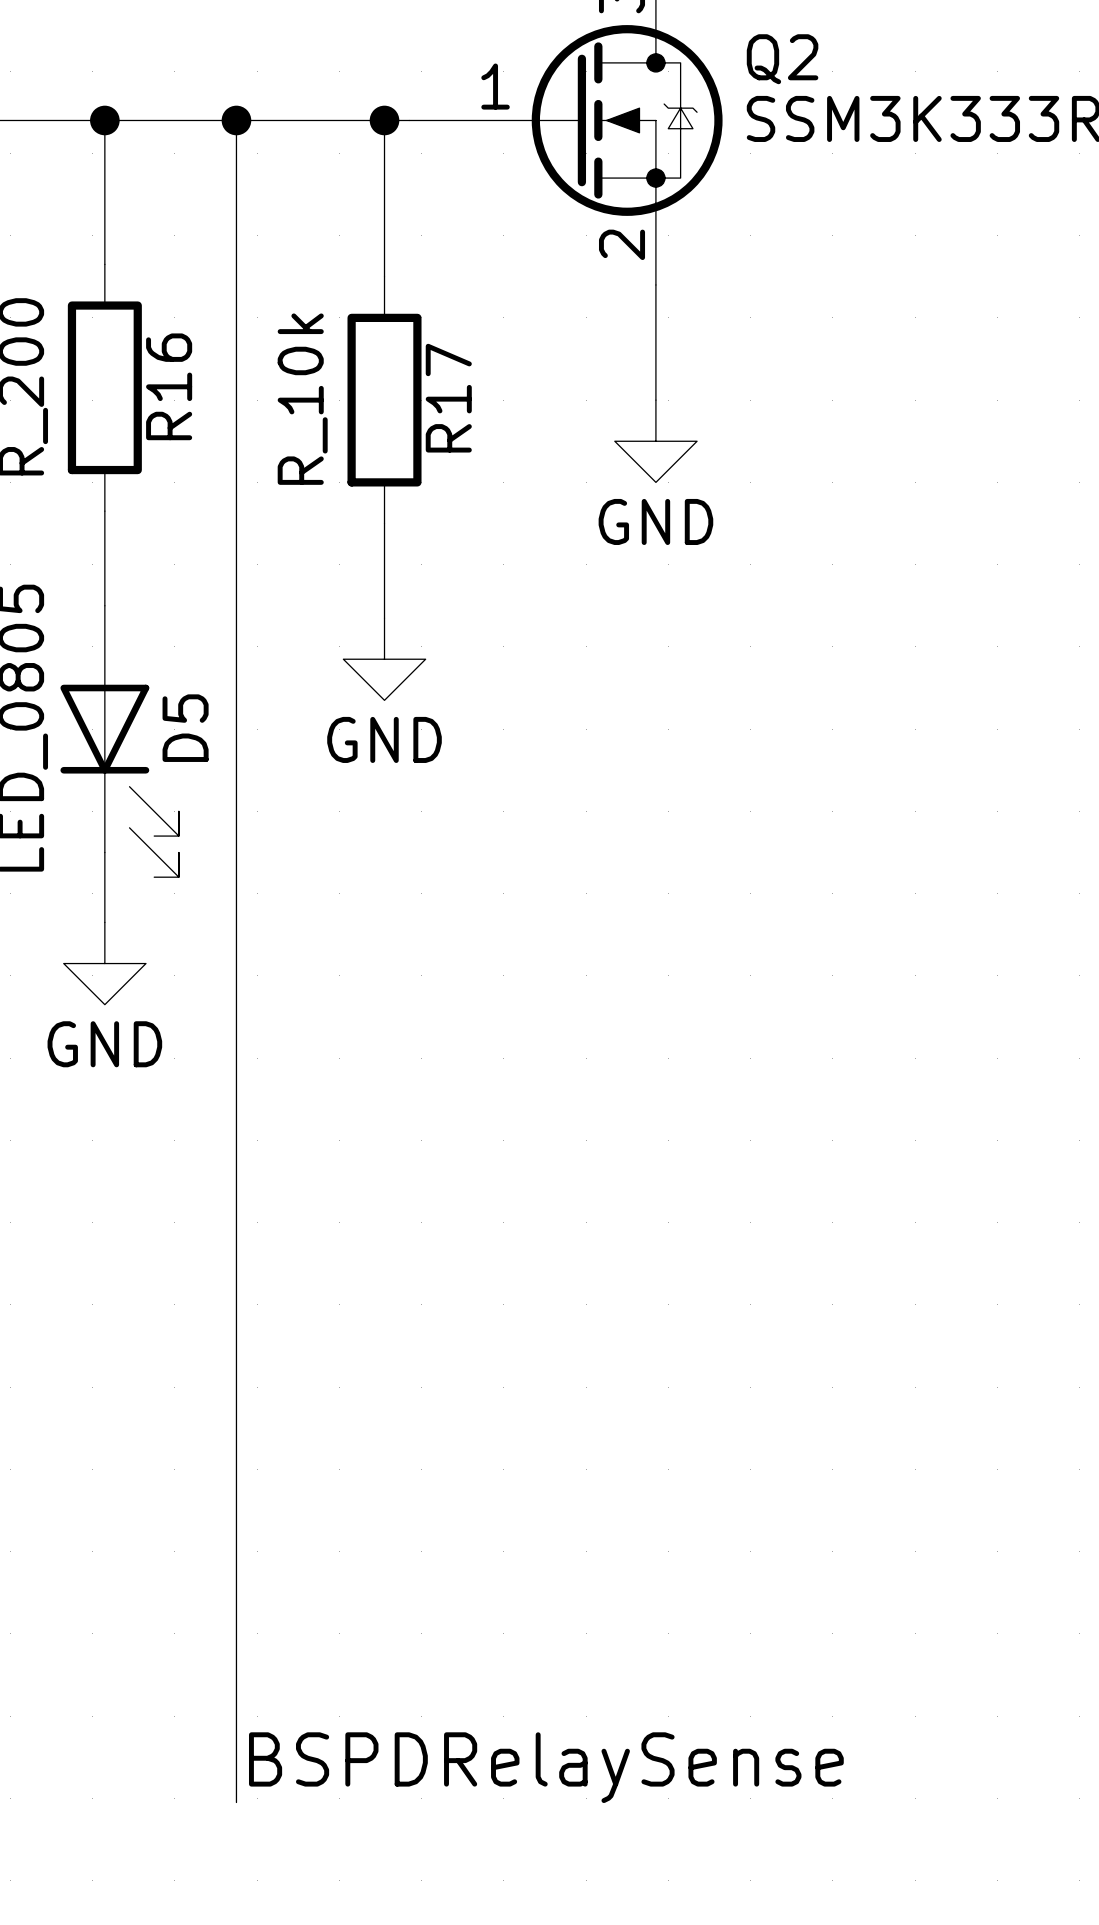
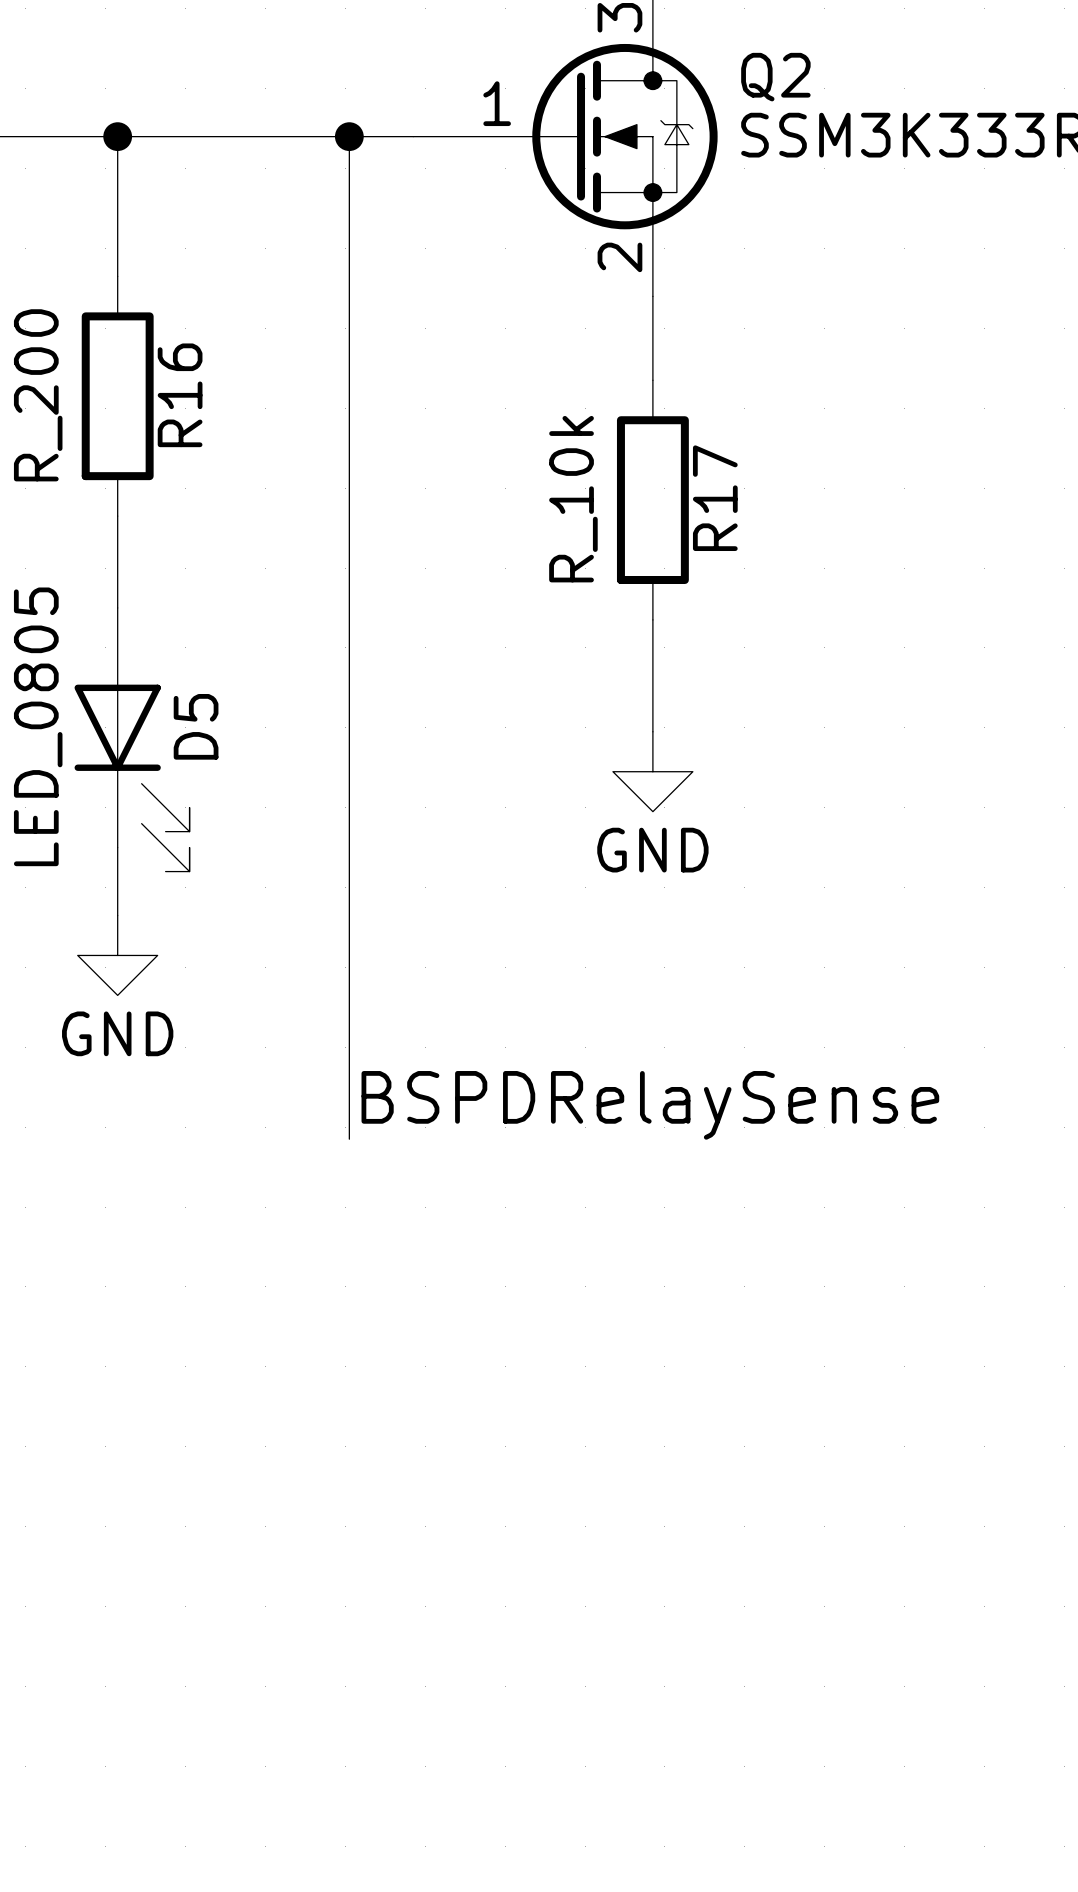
wire: (236, 120) (236, 1802) -> none
junction: (236, 120) -> none
wire: none -> (349, 136) (349, 1139)
wire: (384, 120) (384, 276) -> none
junction position: (384, 120) -> (349, 136)
R17 position: (384, 400) -> (652, 500)
power symbol: GND (655, 441) -> none
wire: (384, 523) (384, 618) -> none
wire: none -> (652, 619) (652, 731)
power symbol: GND (384, 659) -> none
power symbol: none -> GND (652, 771)
label position: BSPDRelaySense (546, 1767) -> BSPDRelaySense (650, 1105)

